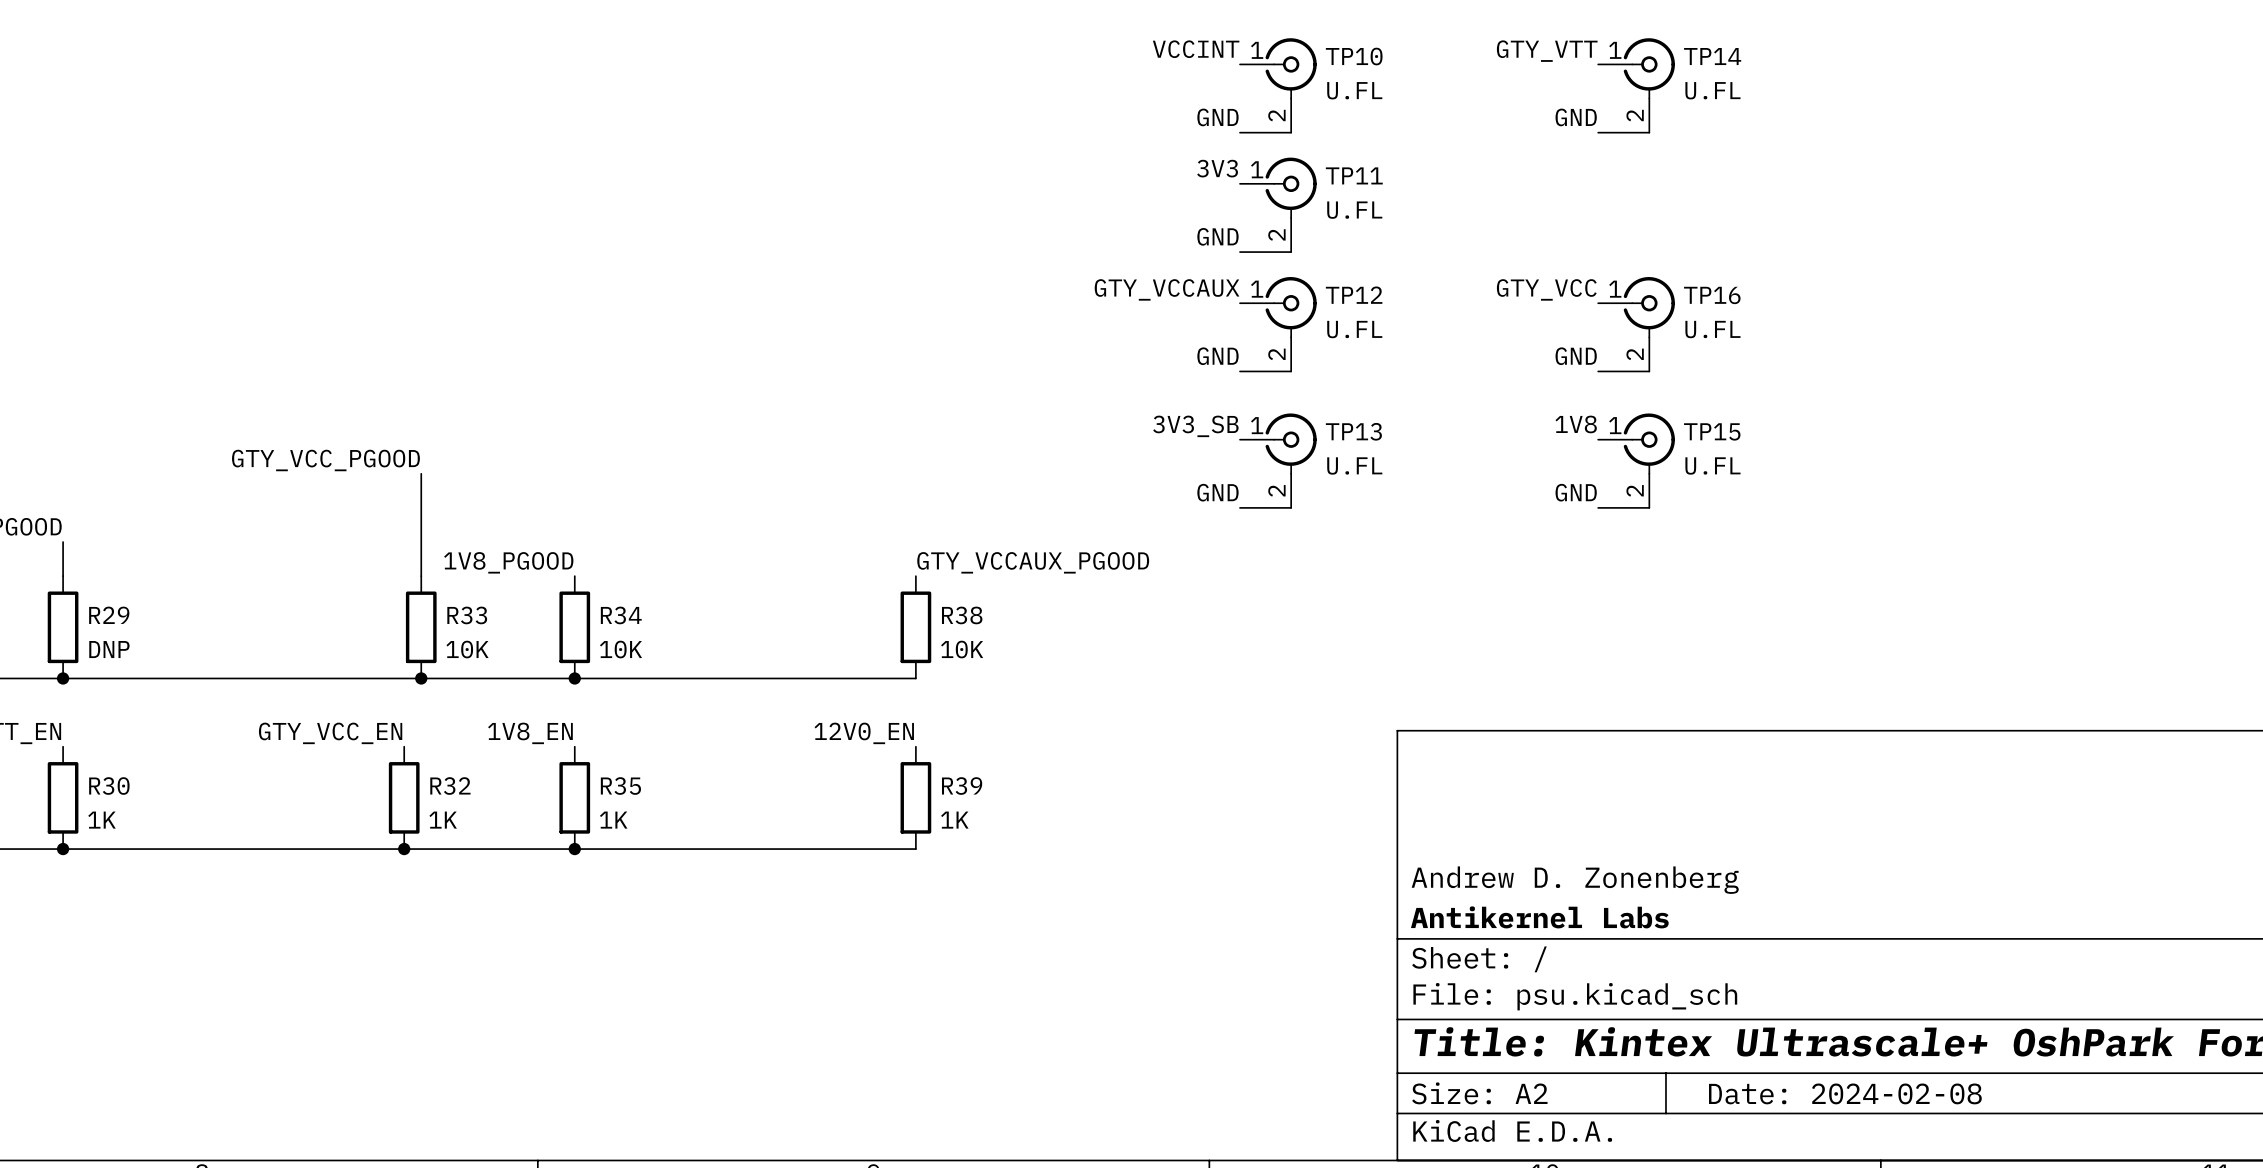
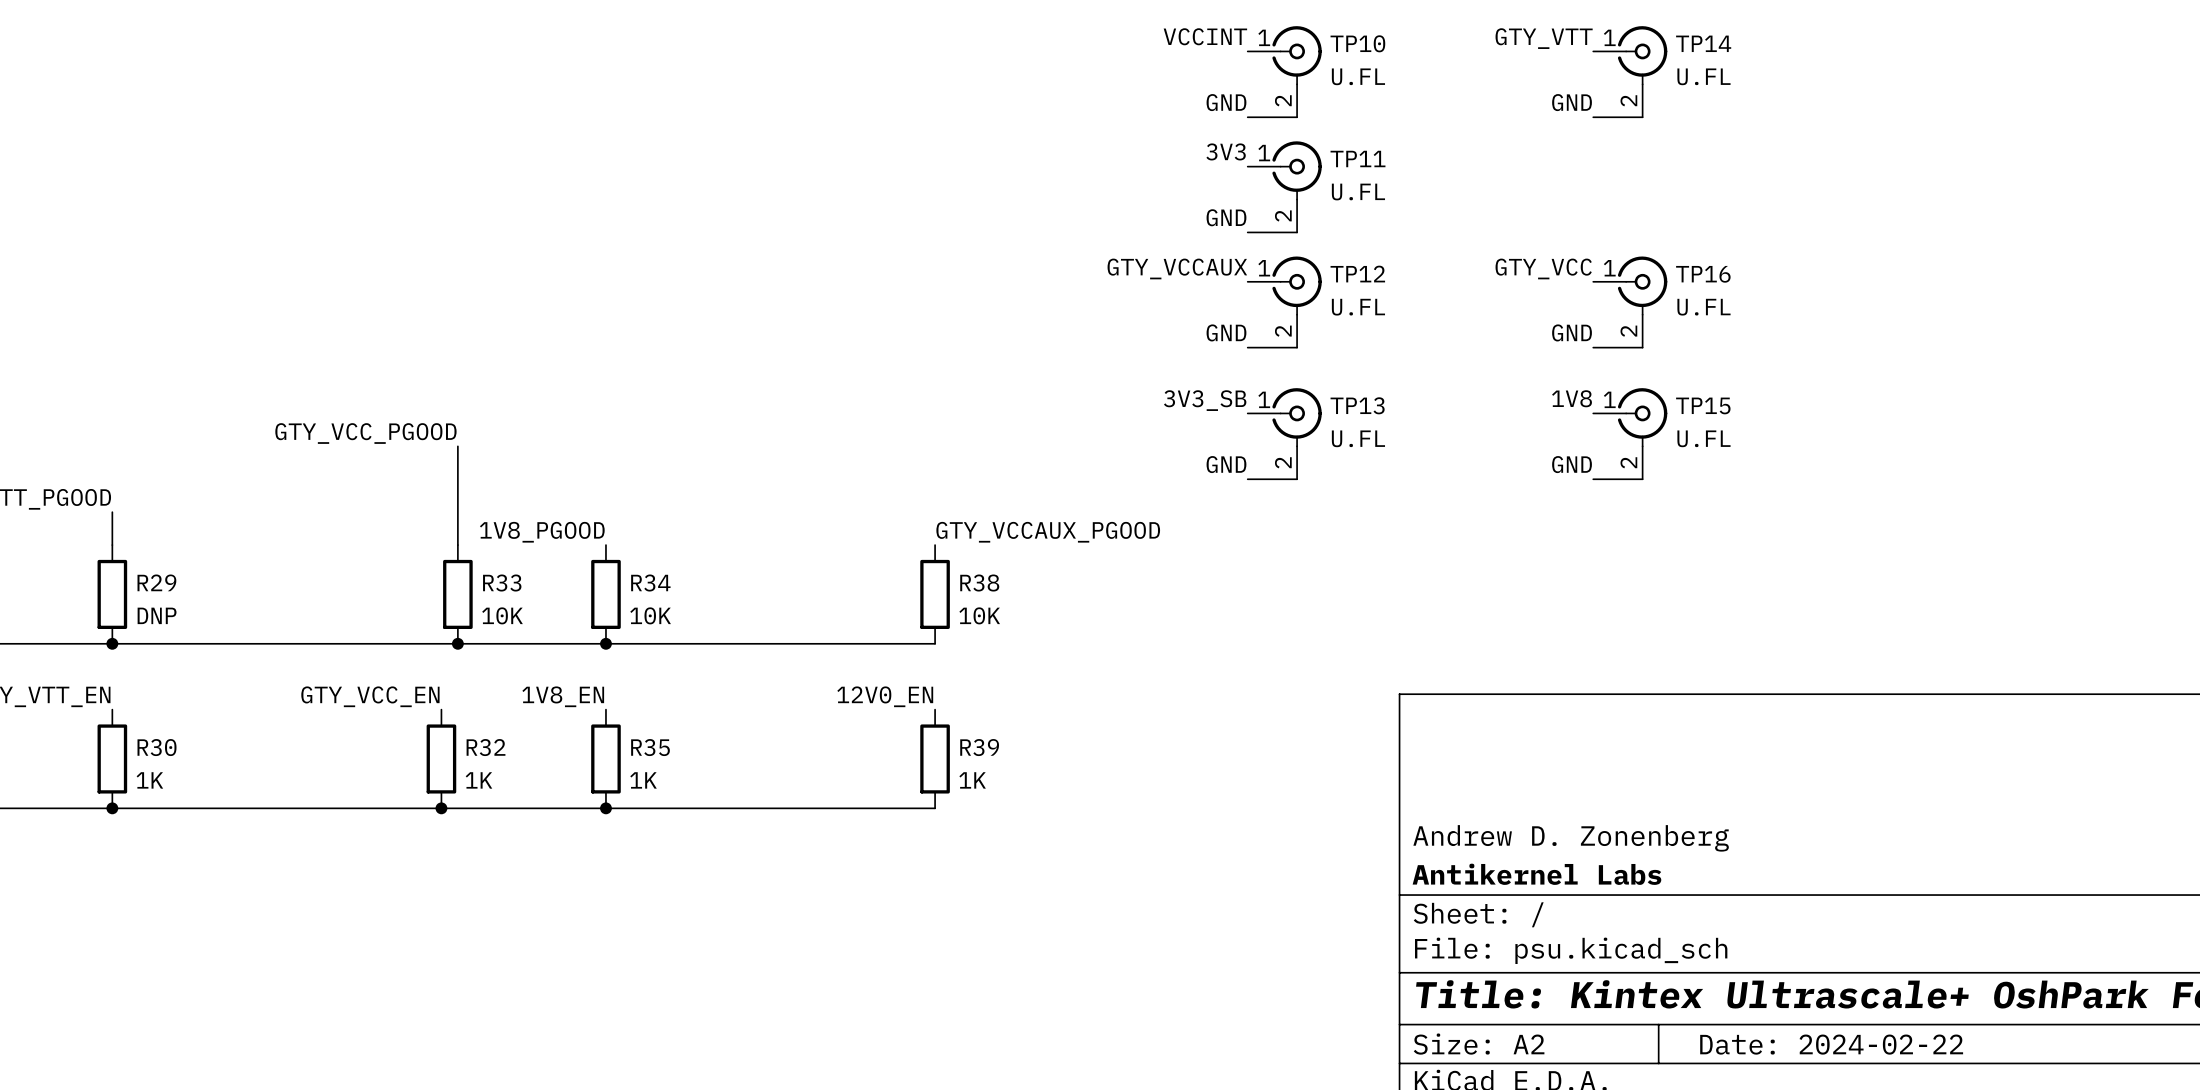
title block: Date: 2024-02-08 (1845, 1093) -> Date: 2024-02-22 (1831, 1044)

